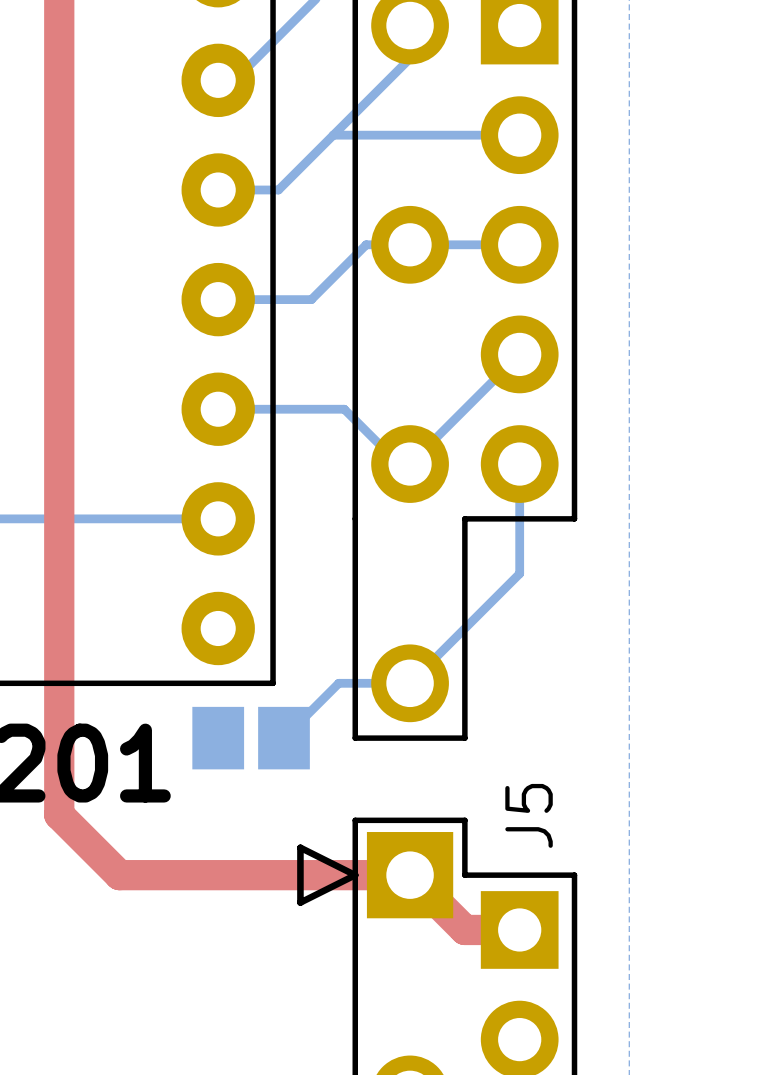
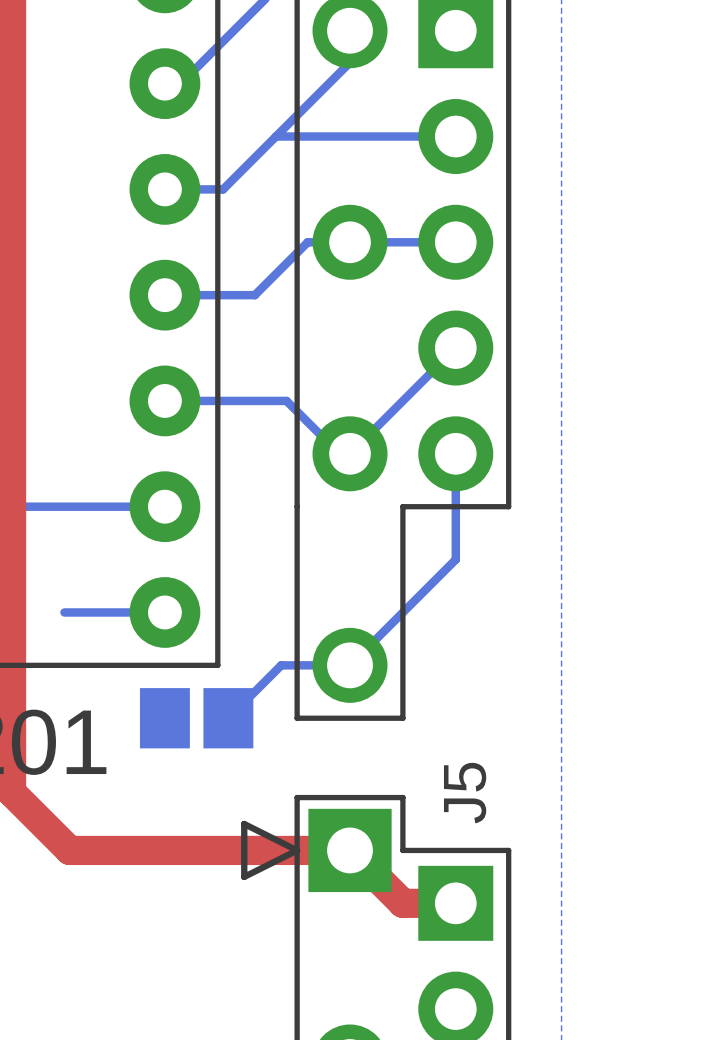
bottom track: none -> (64, 612) (164, 612)

